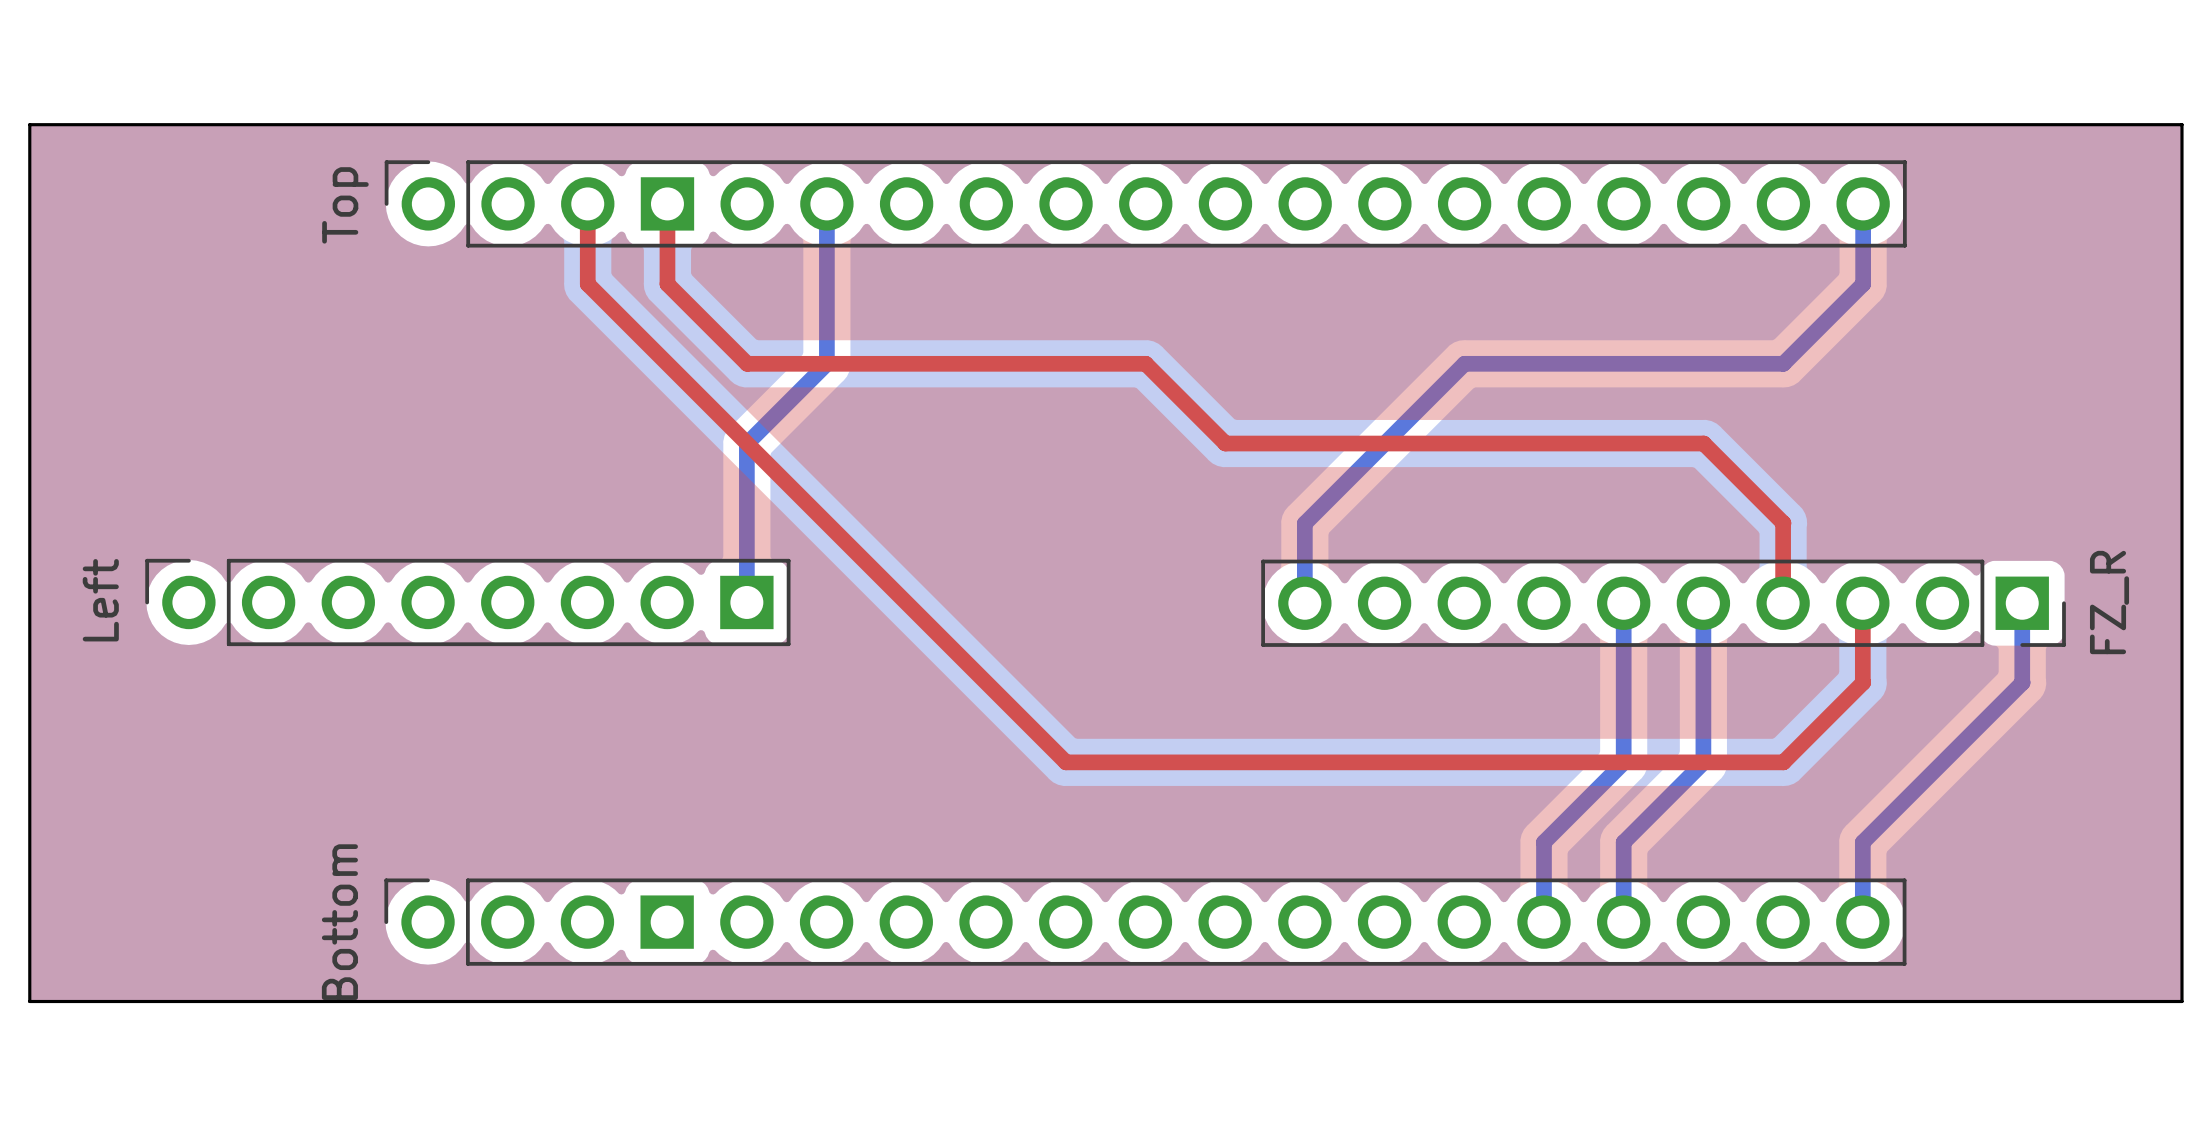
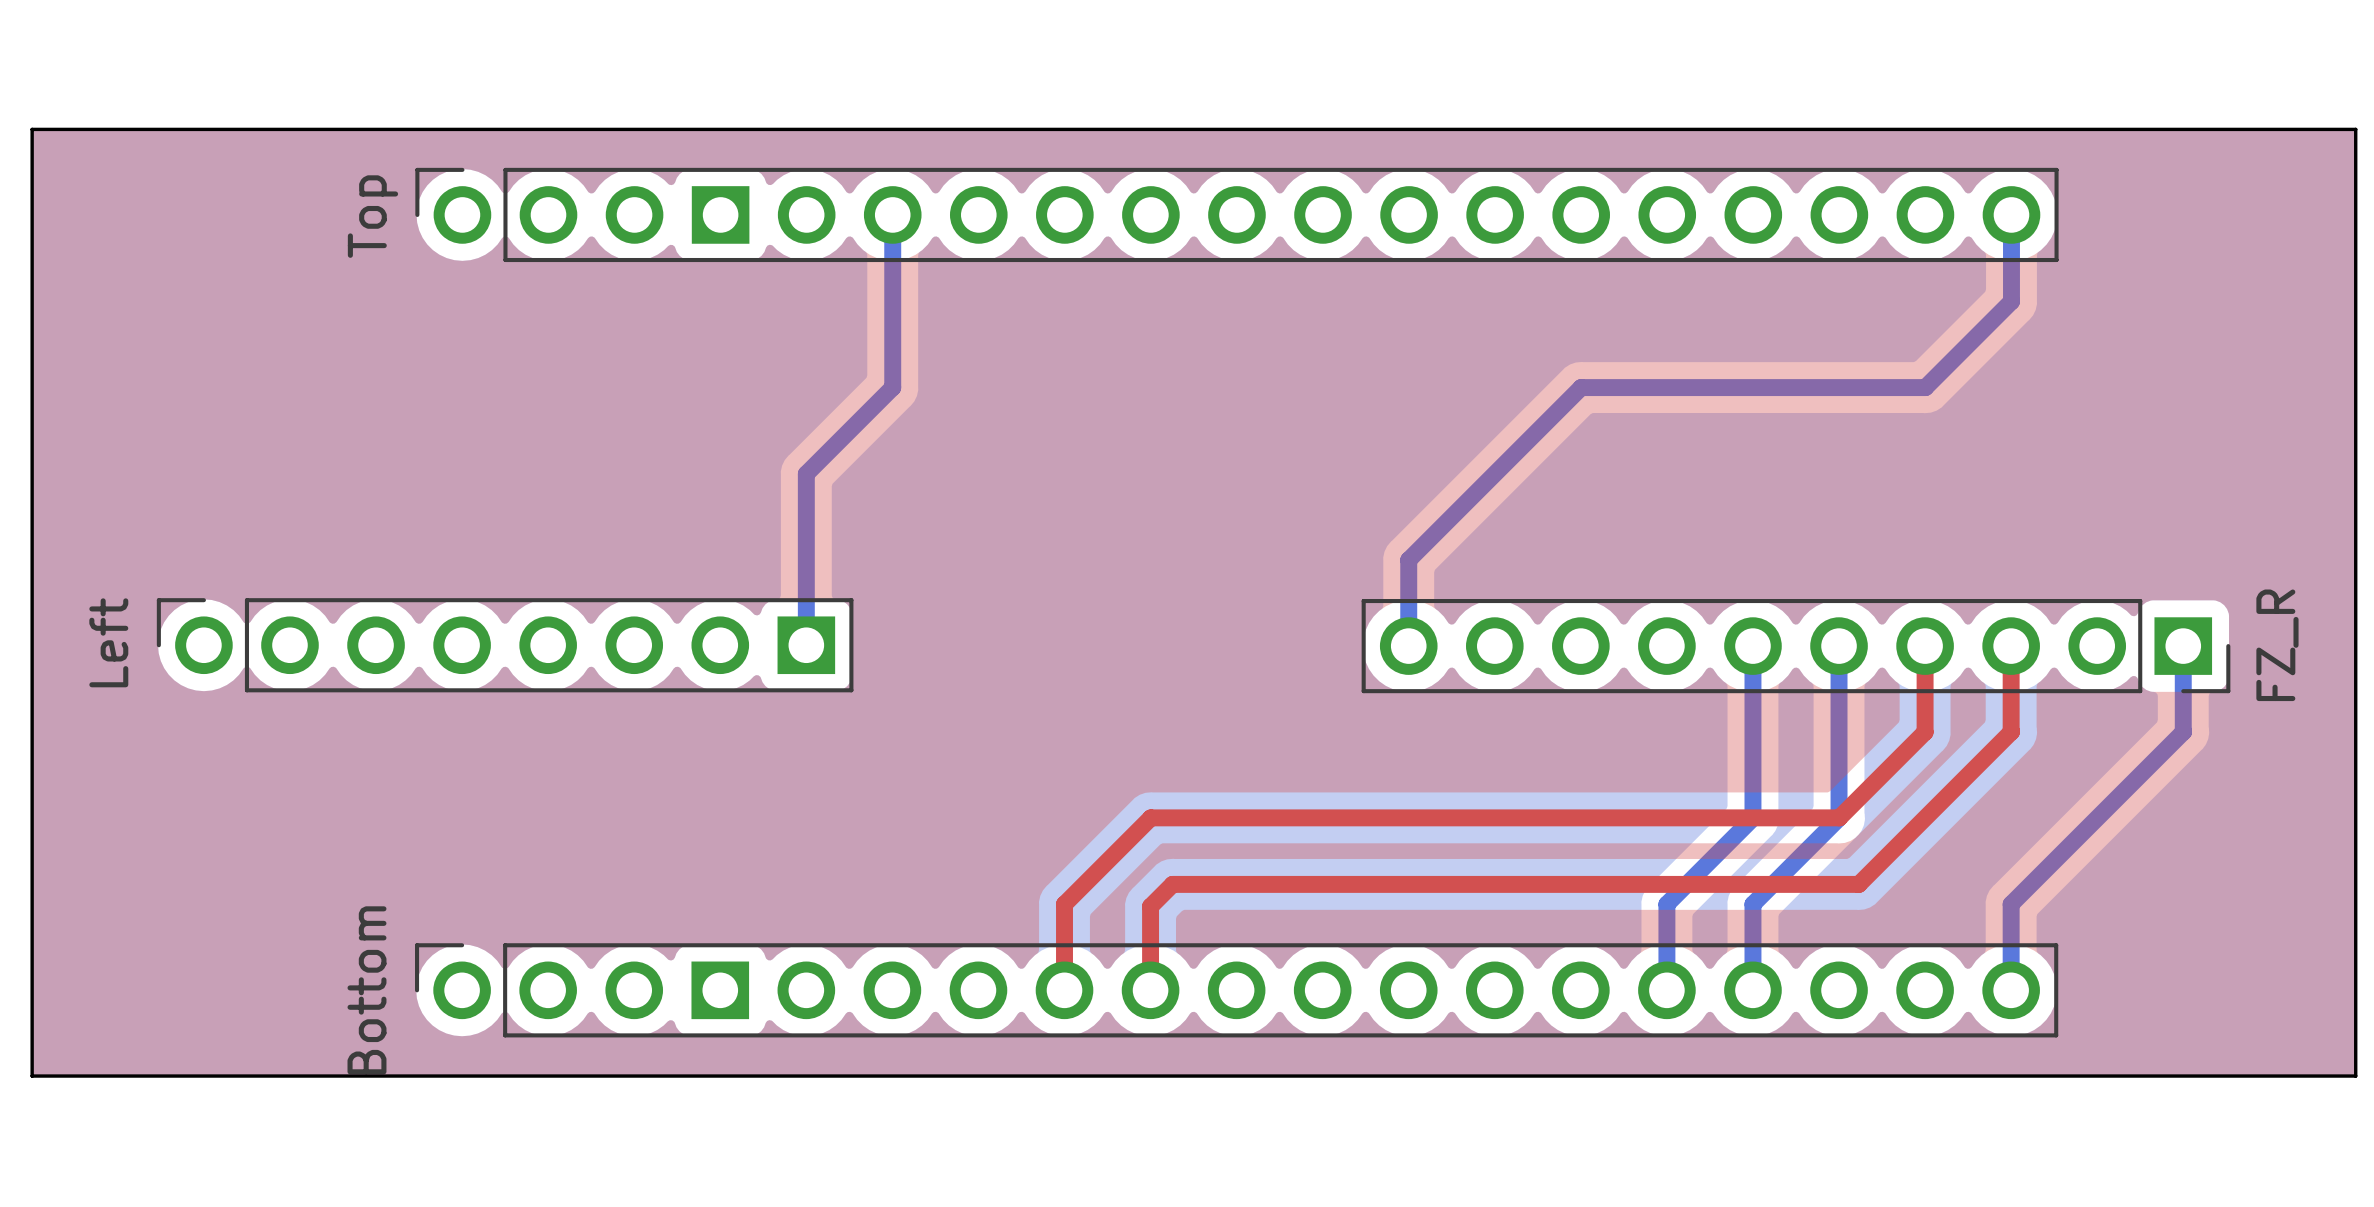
top track: (587, 203) (587, 284) (1066, 762) -> (1064, 990) (1064, 904) (1150, 817)
top track: (667, 203) (667, 284) (747, 363) (1145, 363) (1225, 443) (1703, 443) (1783, 523) -> none
top track: (1783, 523) (1783, 603) -> none
top track: (1703, 762) (1783, 762) -> (1839, 817) (1925, 732) (1925, 646)
top track: none -> (1925, 817) (1858, 884) (1172, 884) (1150, 906) (1150, 990)

